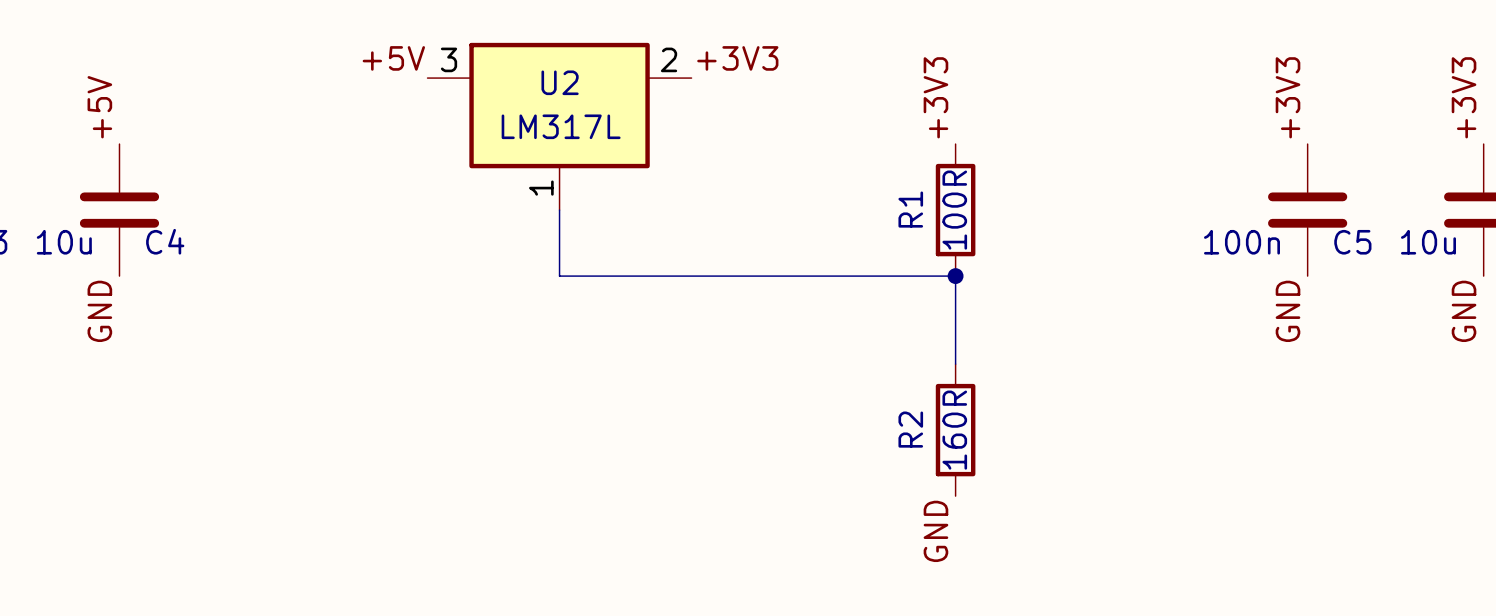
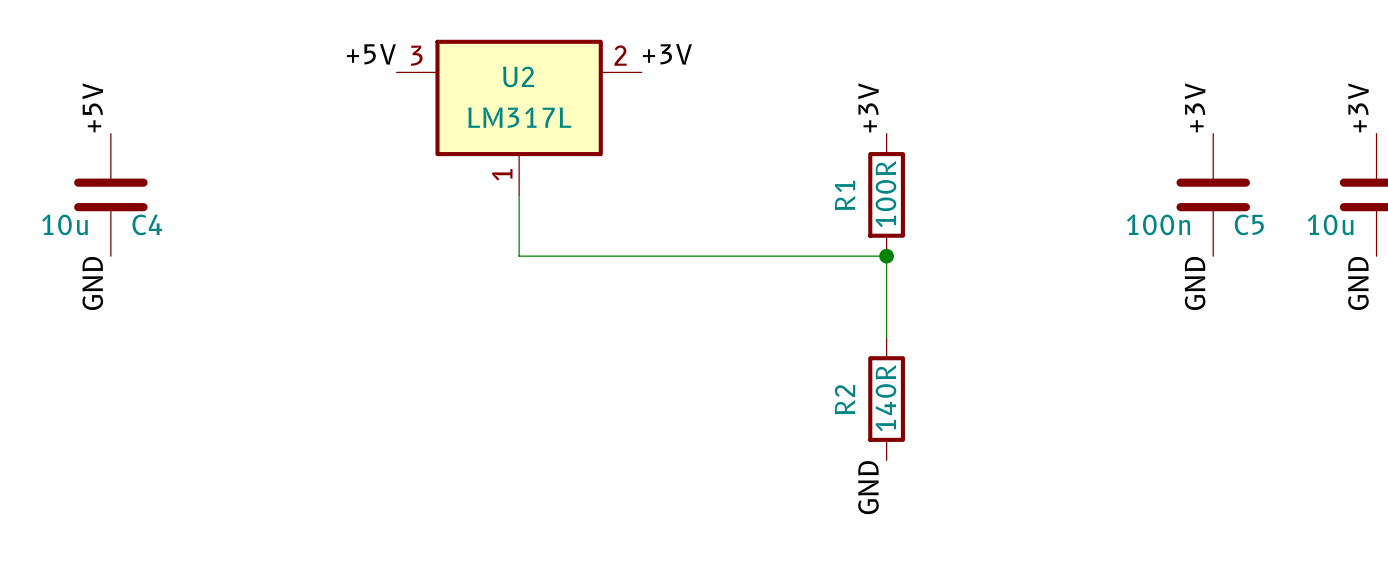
label: +3V3 (737, 58) -> +3V (667, 54)
label: +3V3 (935, 97) -> +3V (868, 107)
label: +3V3 (1288, 97) -> +3V (1195, 107)
label: +3V3 (1464, 97) -> +3V (1358, 107)
R2 value: 160R (954, 430) -> 140R (885, 398)

